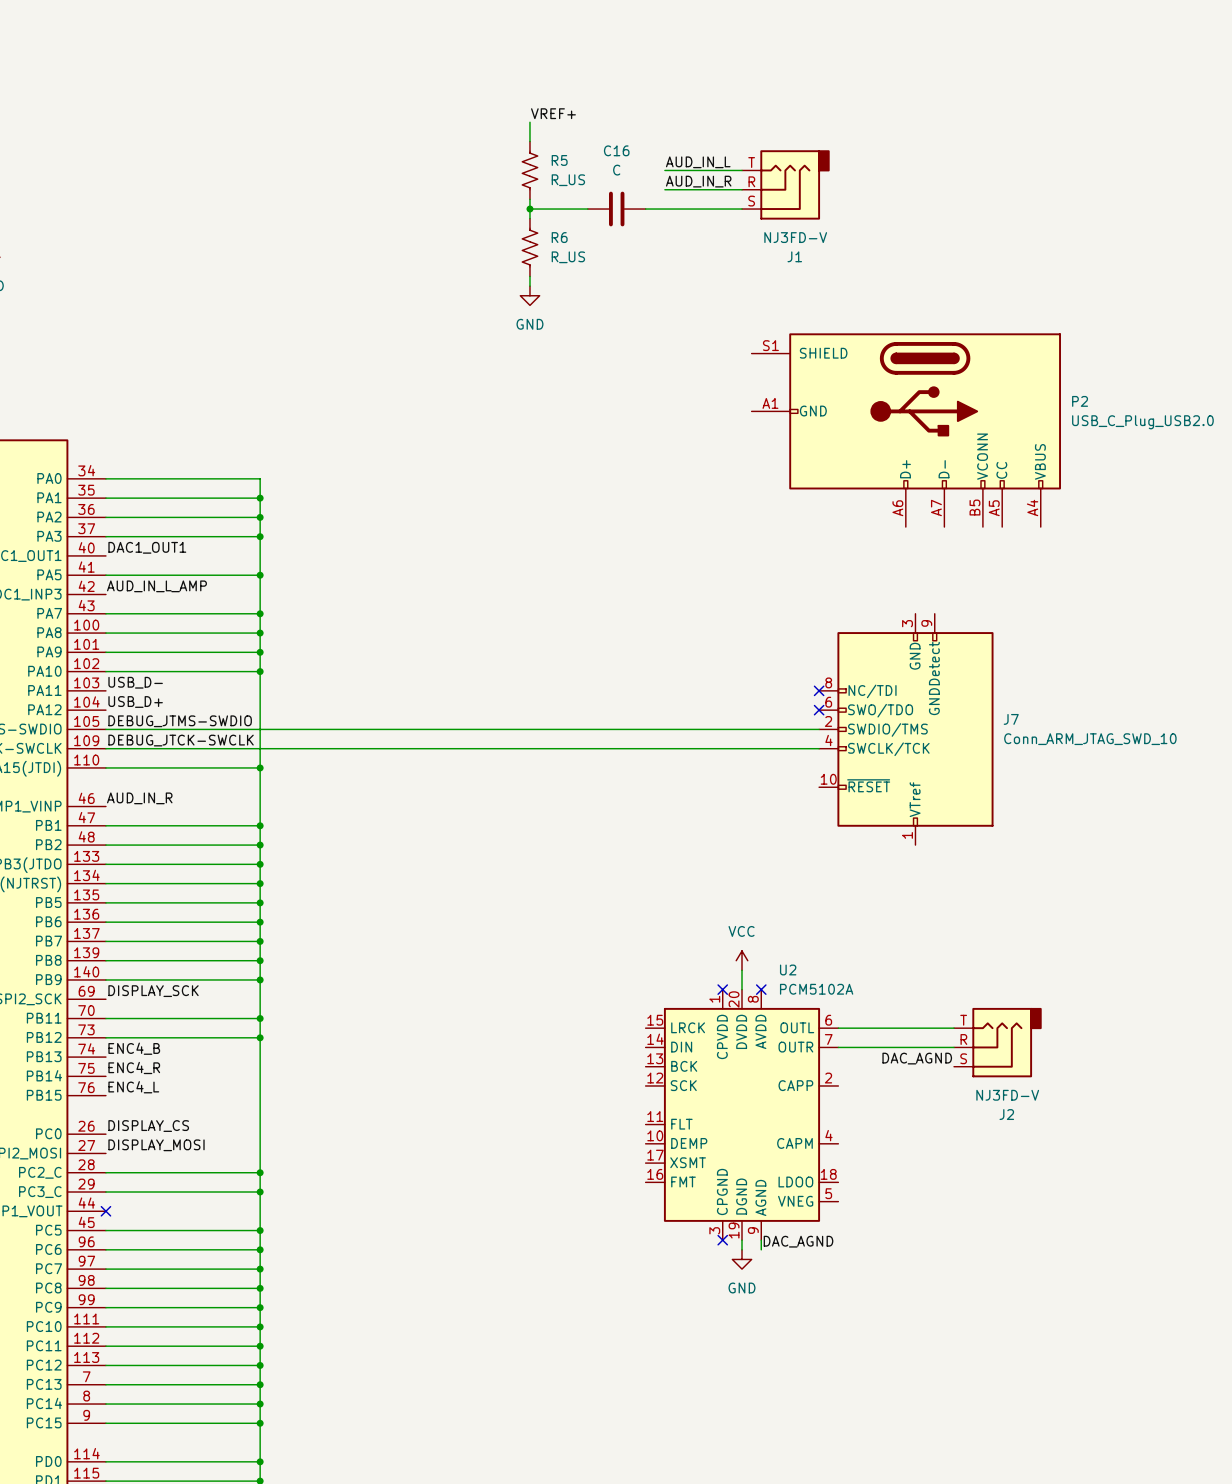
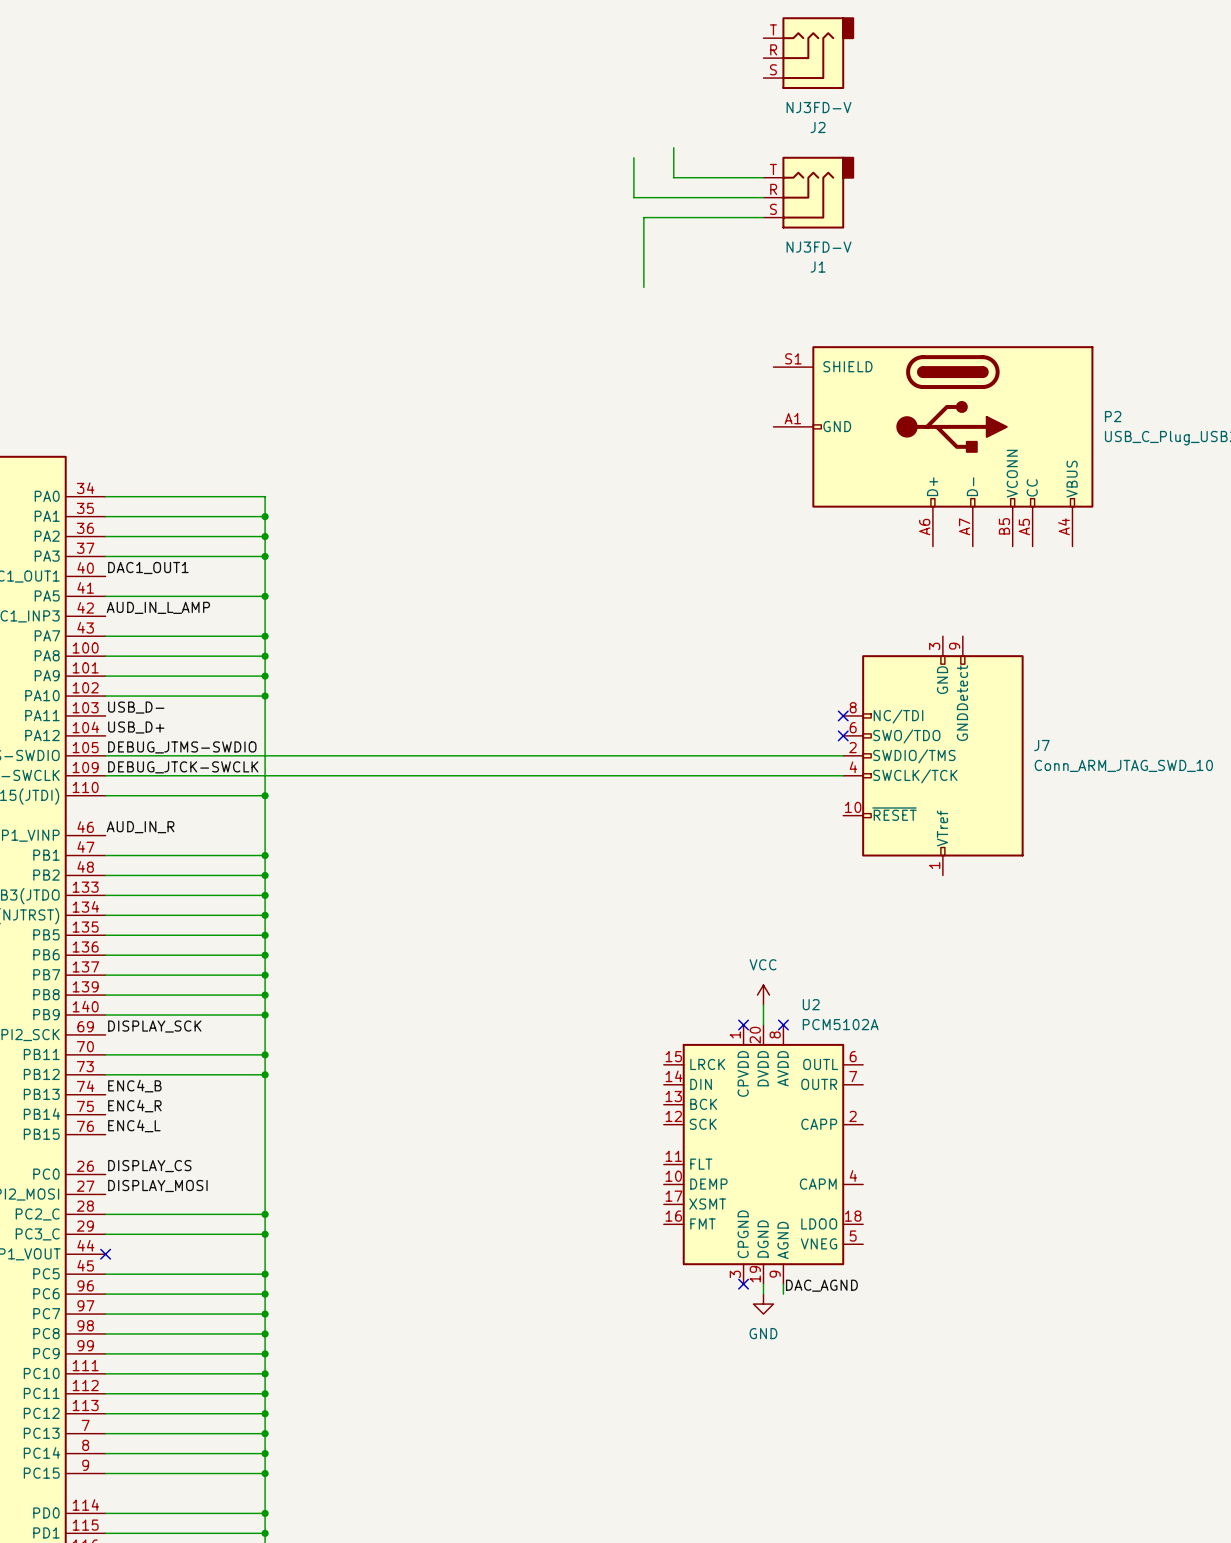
label: VREF+ (553, 113) -> none
wire: (529, 122) (529, 141) -> none
wire: none -> (673, 147) (673, 177) (683, 177)
wire: none -> (633, 157) (633, 197) (683, 197)
label: AUD_IN_L (698, 162) -> none
R5: R_US (529, 170) -> none
label: AUD_IN_R (698, 181) -> none
wire: (529, 199) (529, 218) -> none
wire: (529, 209) (587, 209) -> none
junction: (529, 209) -> none
C16: C (616, 209) -> none
wire: none -> (663, 217) (643, 217) (643, 287)
R6: R_US (529, 247) -> none
wire: (529, 276) (529, 286) -> none
power symbol: GND (529, 295) -> none
wire: (838, 1028) (954, 1028) -> none
J2 position: (997, 1042) -> (808, 53)
wire: (838, 1047) (954, 1047) -> none
label: DAC_AGND (917, 1058) -> none

